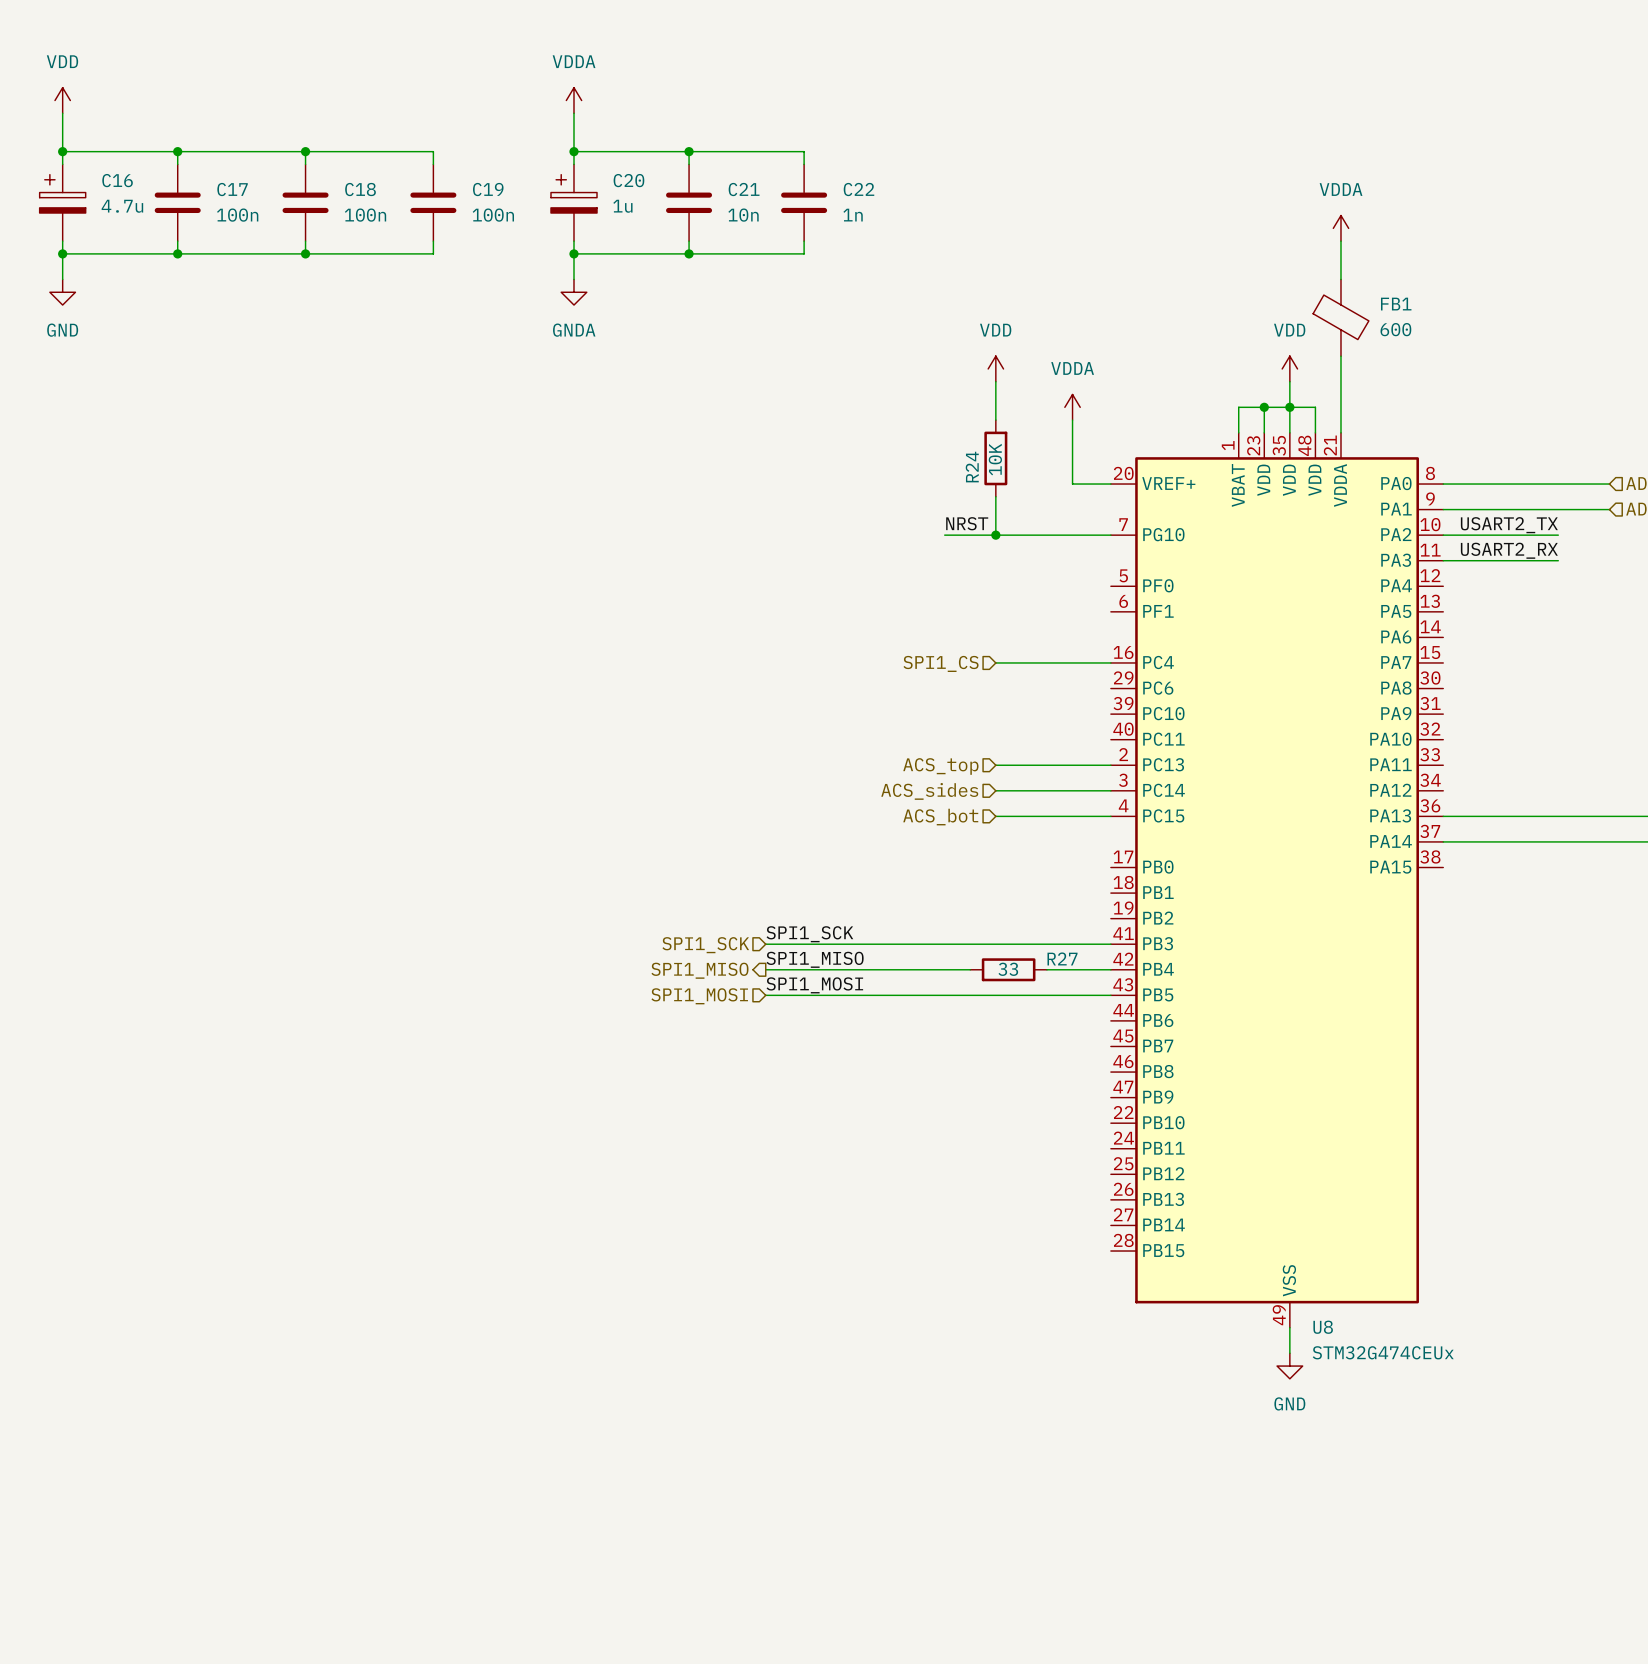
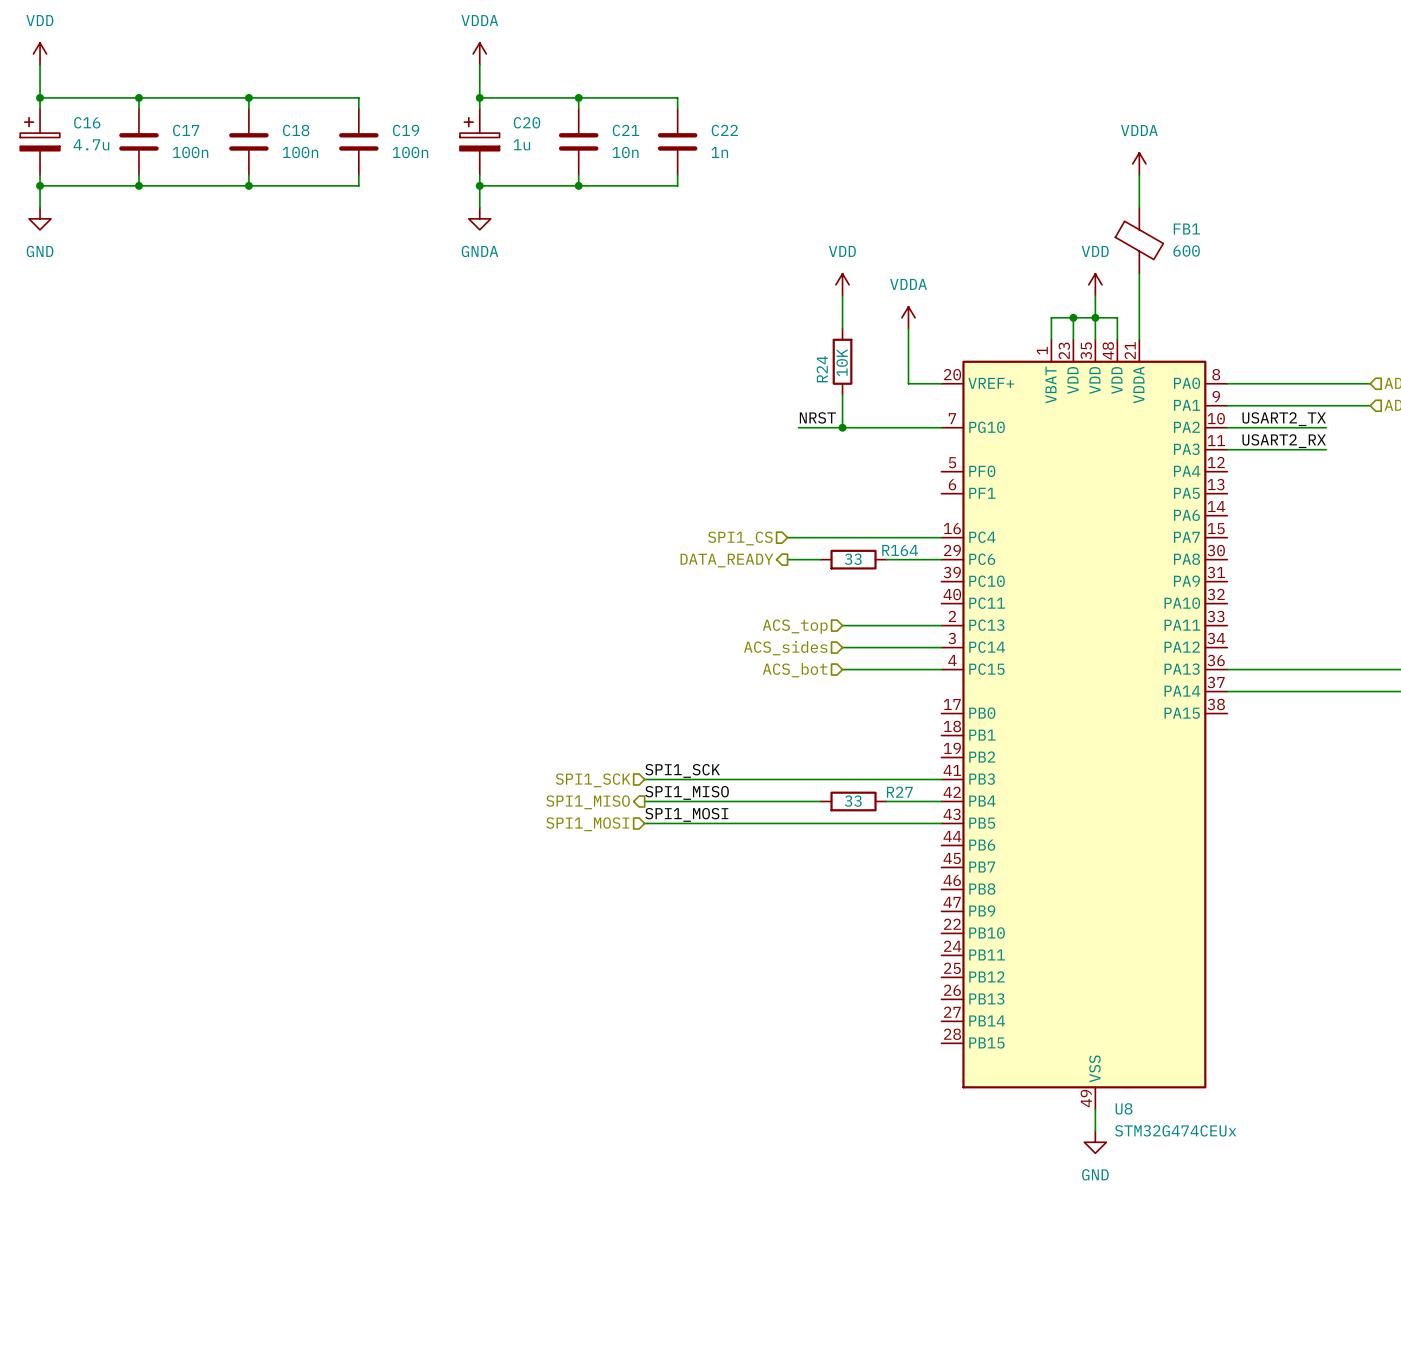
wire: none -> (787, 537) (842, 537)
hierarchical label position: SPI1_CS (941, 663) -> SPI1_CS (740, 538)
wire: none -> (787, 559) (820, 559)
R164: none -> 33 (853, 559)
wire: none -> (886, 559) (941, 559)
hierarchical label: none -> DATA_READY (726, 560)

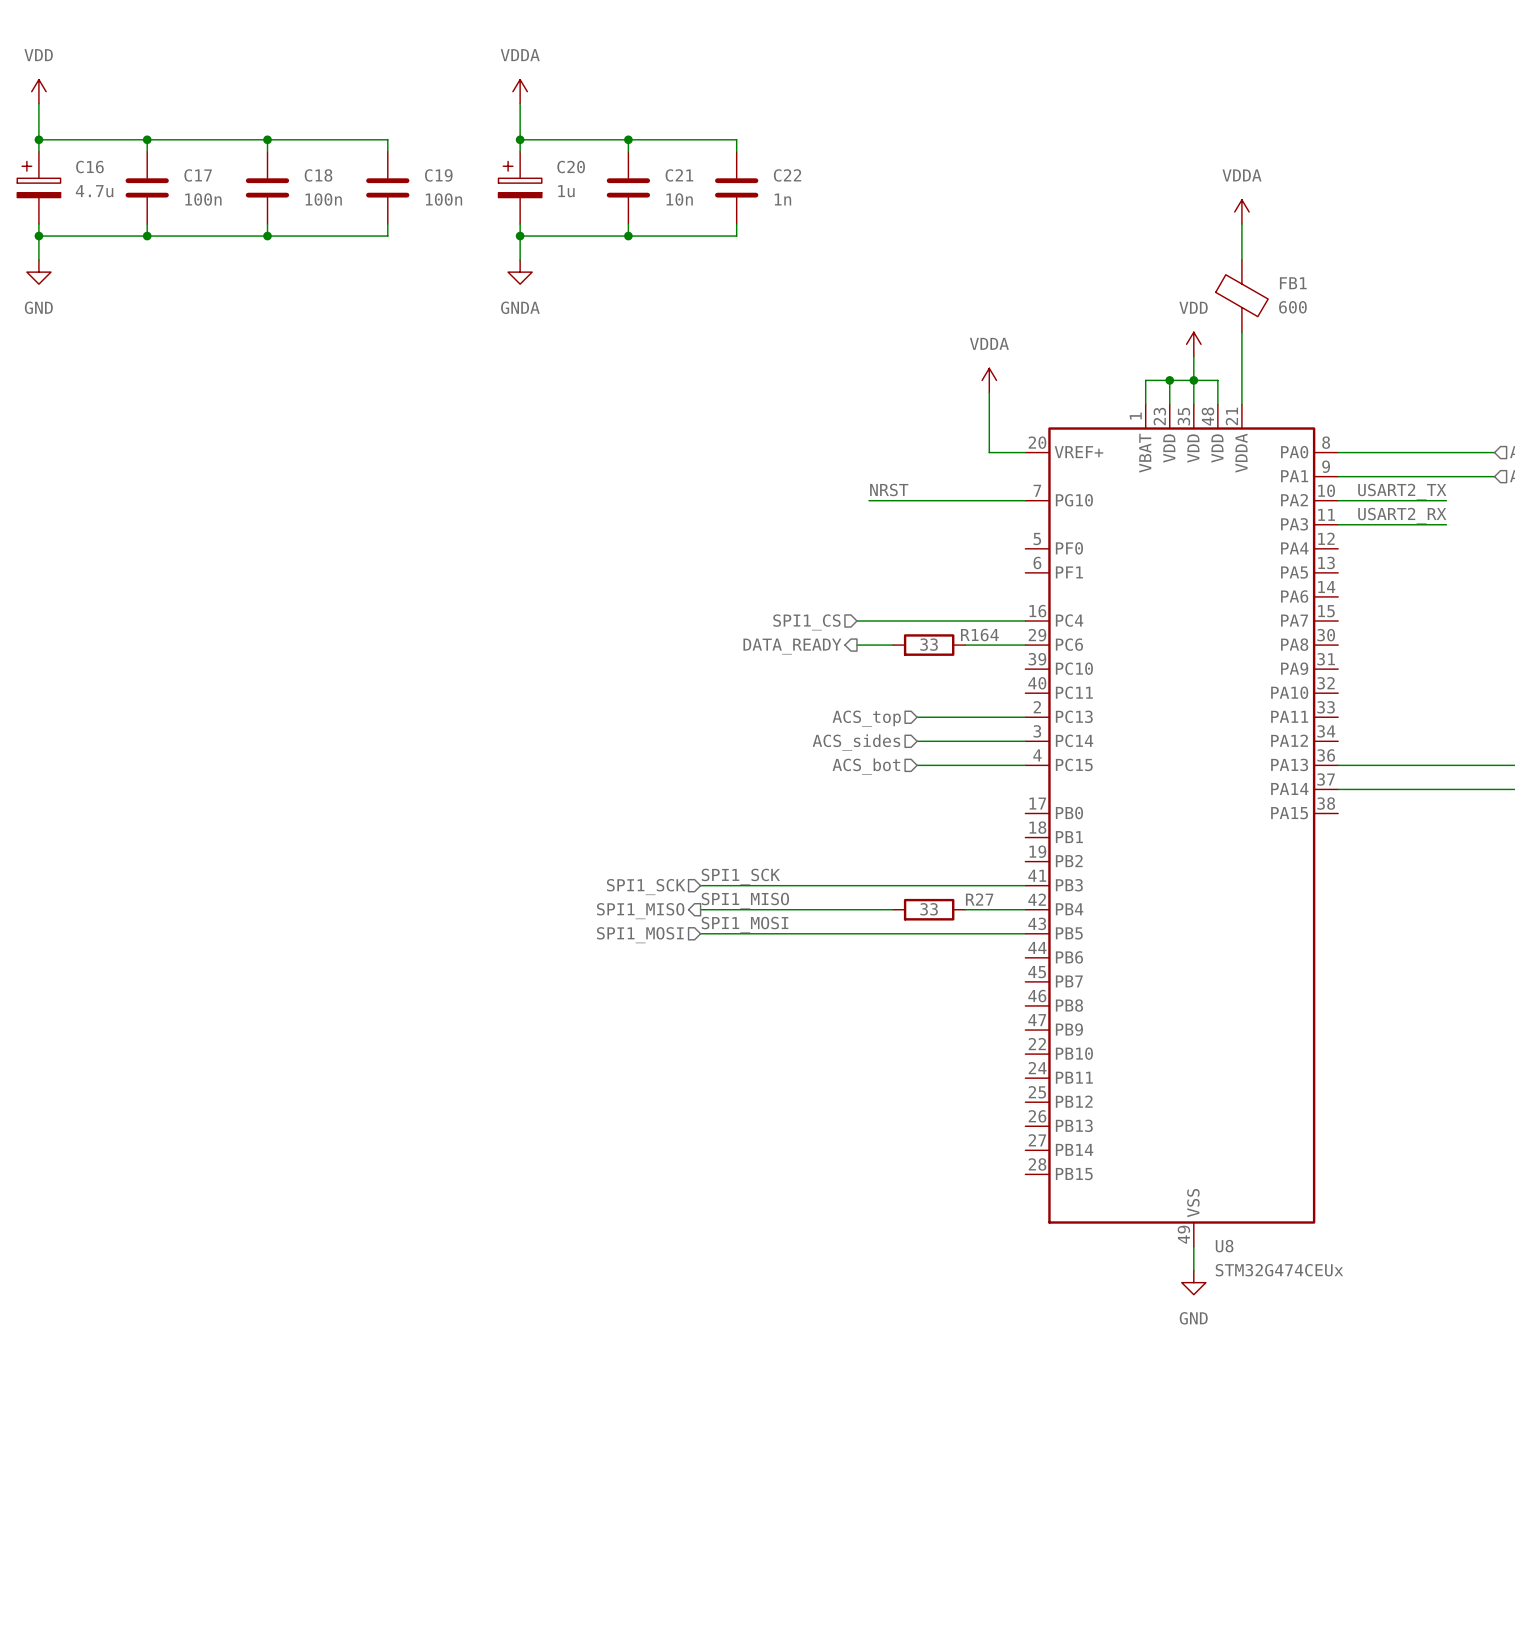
power symbol: VDD (842, 284) -> none
wire: (842, 295) (842, 328) -> none
R24: 10K (842, 361) -> none
wire: (842, 394) (842, 427) -> none
junction: (842, 427) -> none

